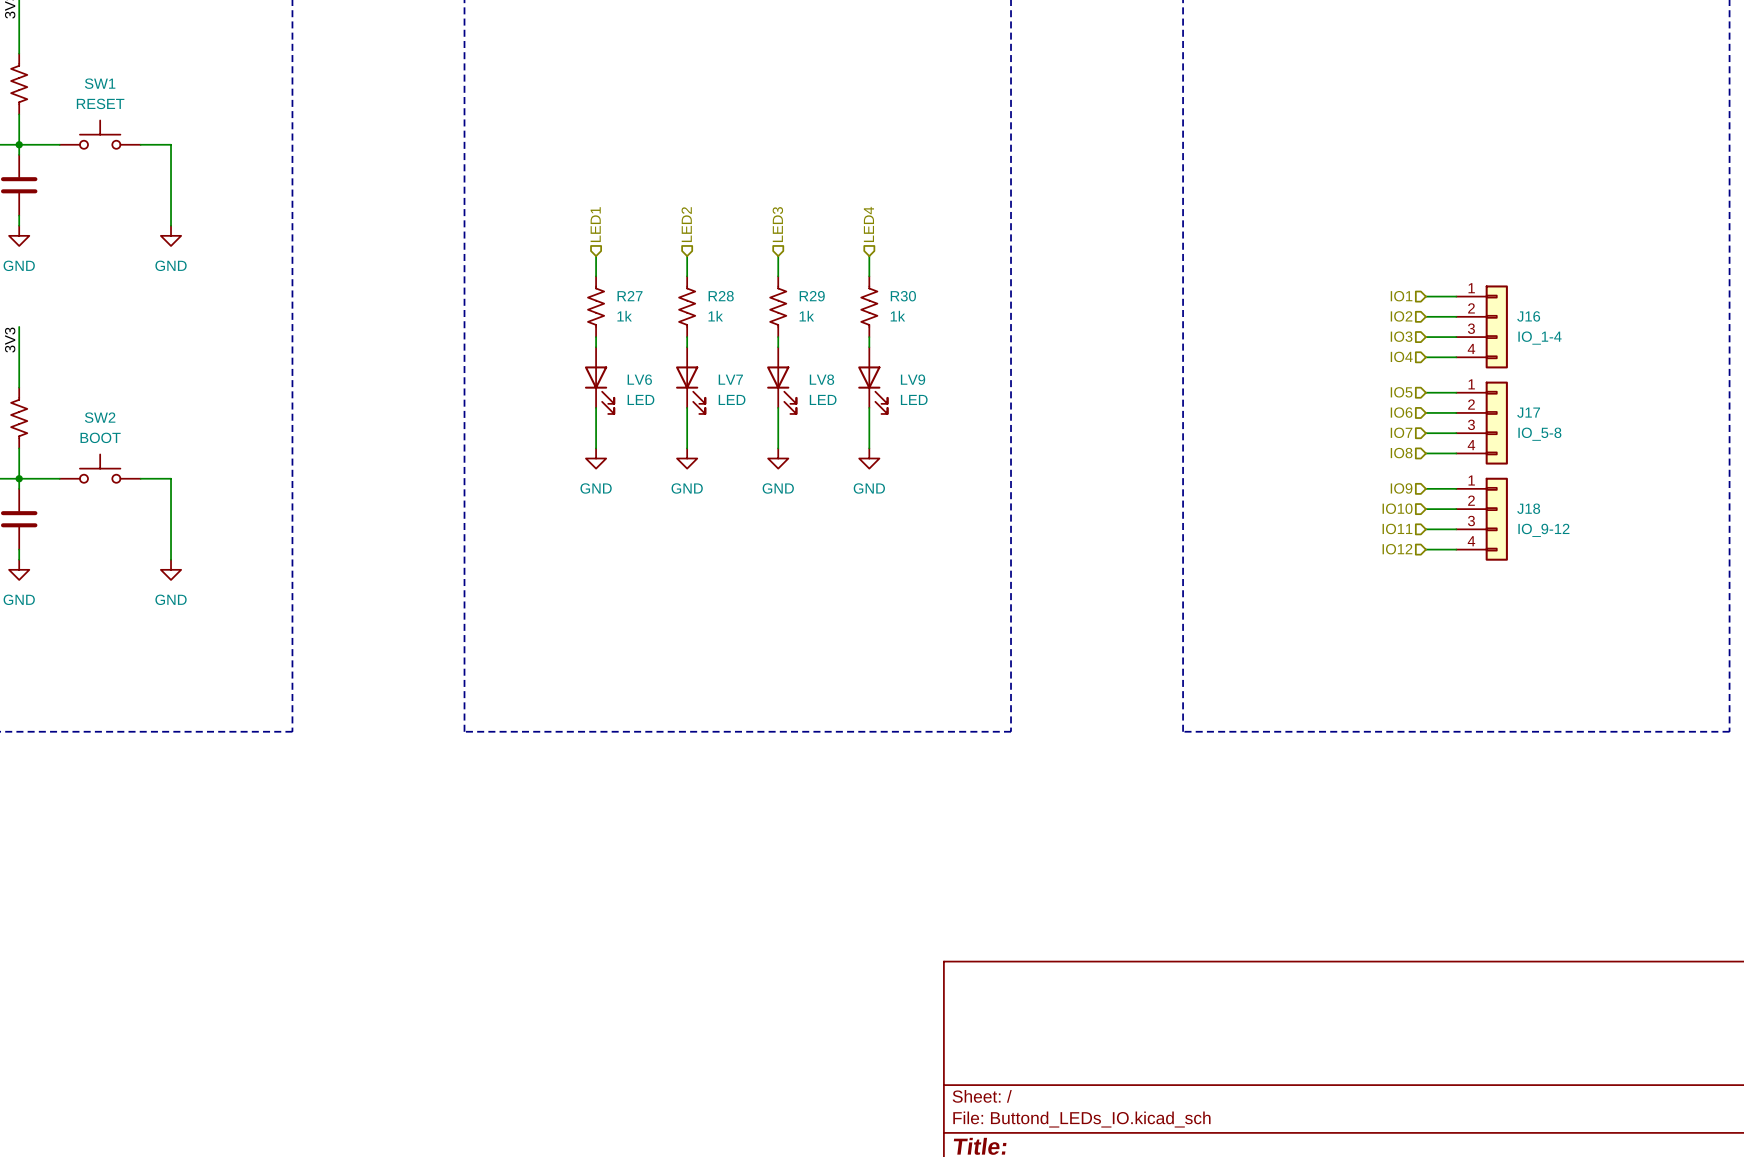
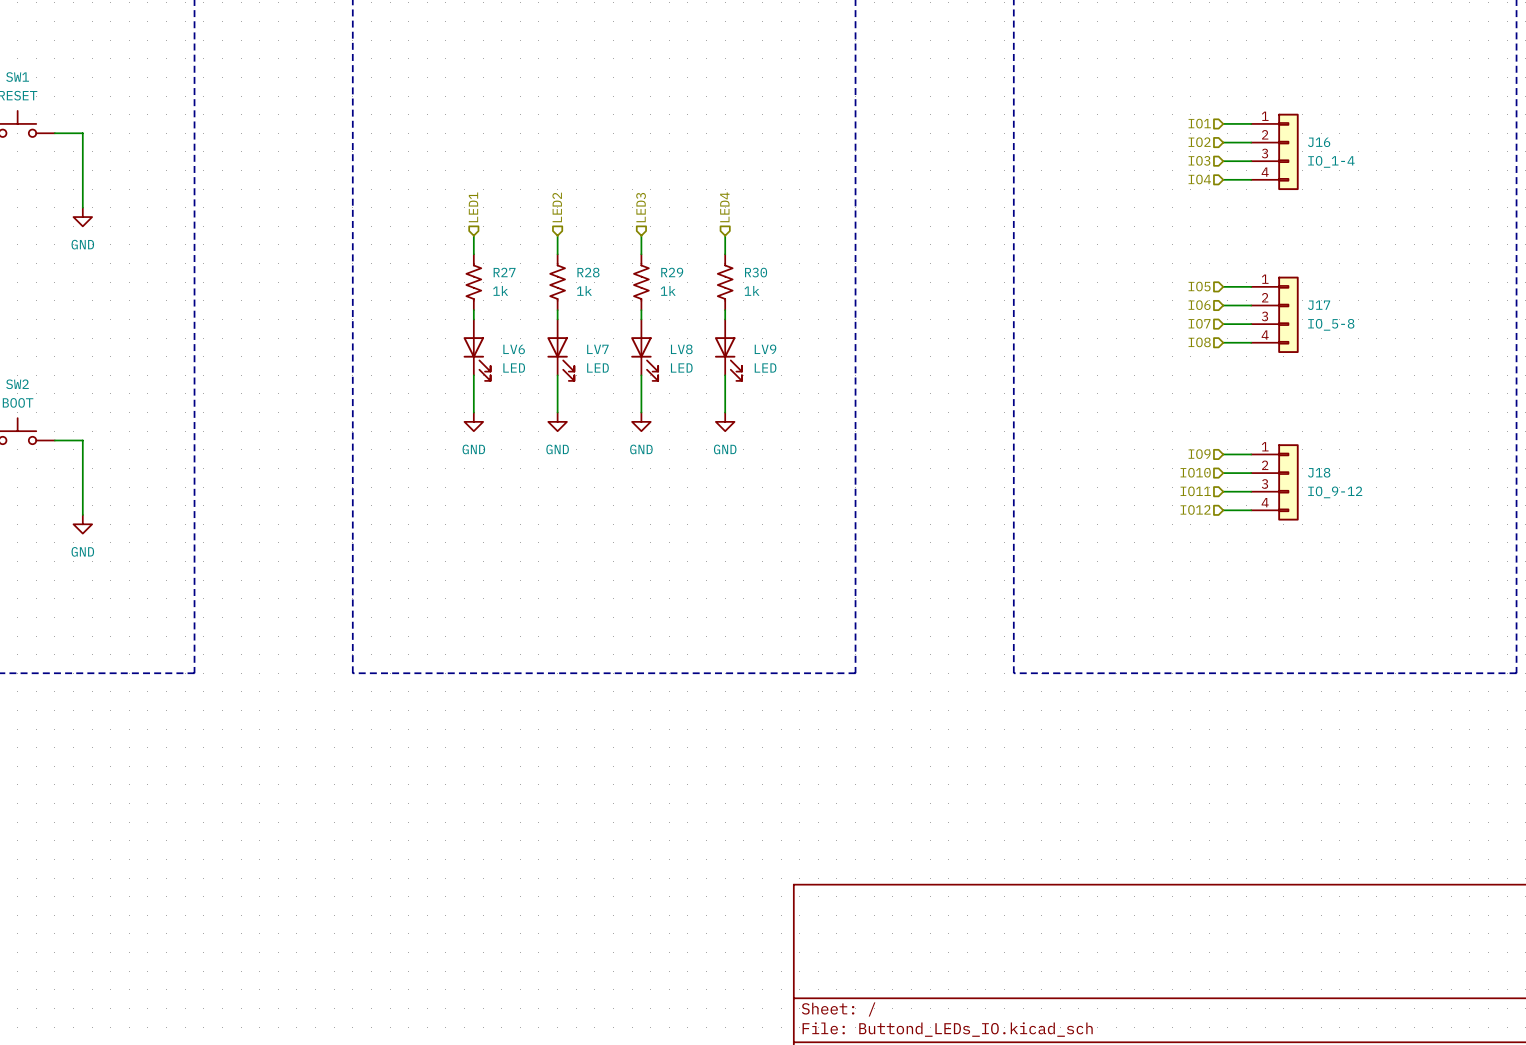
wire: none -> (1223, 123) (1251, 123)
wire: none -> (1223, 142) (1251, 142)
wire: none -> (1223, 161) (1251, 161)
hierarchical label position: IO1 (1401, 296) -> IO1 (1199, 123)
wire: (1425, 296) (1456, 296) -> (1223, 286) (1251, 286)
hierarchical label position: IO2 (1401, 316) -> IO2 (1199, 142)
wire: (1425, 316) (1456, 316) -> (1223, 305) (1251, 305)
J16 position: (1482, 326) -> (1274, 151)
hierarchical label position: IO3 (1401, 336) -> IO3 (1199, 160)
wire: (1425, 337) (1456, 337) -> (1223, 324) (1251, 324)
hierarchical label position: IO4 (1401, 356) -> IO4 (1199, 179)
wire: (1425, 357) (1456, 357) -> (1223, 342) (1251, 342)
hierarchical label position: IO5 (1401, 392) -> IO5 (1199, 286)
wire: (1425, 392) (1456, 392) -> (1223, 179) (1251, 179)
hierarchical label position: IO6 (1401, 412) -> IO6 (1199, 305)
wire: (1425, 412) (1456, 412) -> none
J17 position: (1482, 423) -> (1274, 314)
hierarchical label position: IO7 (1401, 432) -> IO7 (1199, 323)
wire: (1425, 433) (1456, 433) -> none
hierarchical label position: IO8 (1401, 453) -> IO8 (1199, 342)
wire: (1425, 453) (1456, 453) -> none
hierarchical label position: IO9 (1401, 488) -> IO9 (1199, 454)
wire: (1425, 488) (1456, 488) -> (1223, 454) (1251, 454)
hierarchical label position: IO10 (1397, 508) -> IO10 (1195, 472)
wire: (1425, 509) (1456, 509) -> (1223, 473) (1251, 473)
J18 position: (1482, 519) -> (1274, 482)
hierarchical label position: IO11 (1397, 528) -> IO11 (1195, 491)
wire: (1425, 529) (1456, 529) -> (1223, 491) (1251, 491)
hierarchical label position: IO12 (1397, 549) -> IO12 (1195, 509)
wire: (1425, 549) (1456, 549) -> (1223, 510) (1251, 510)

